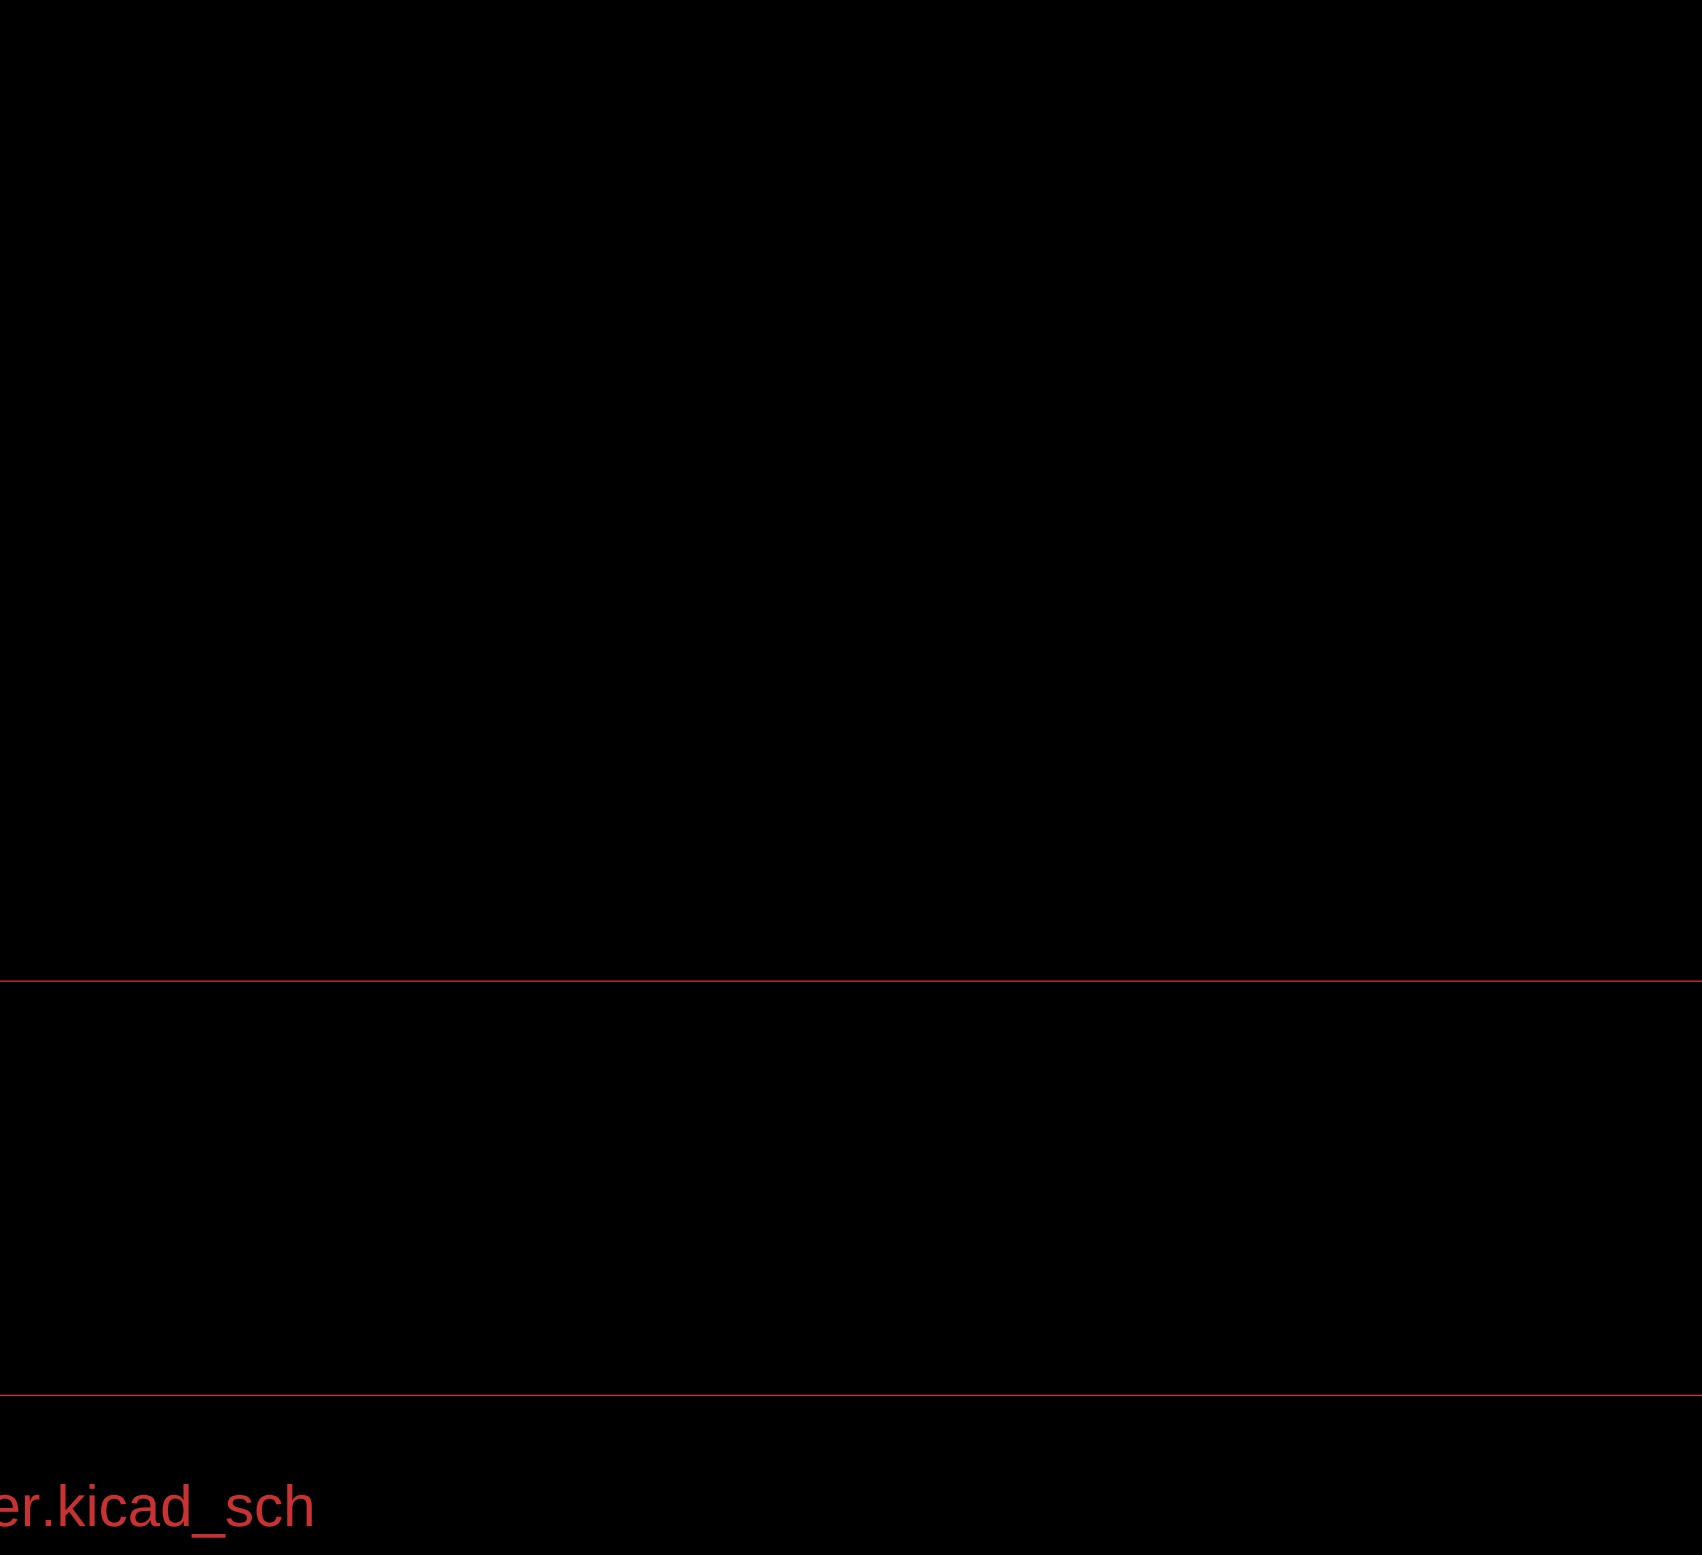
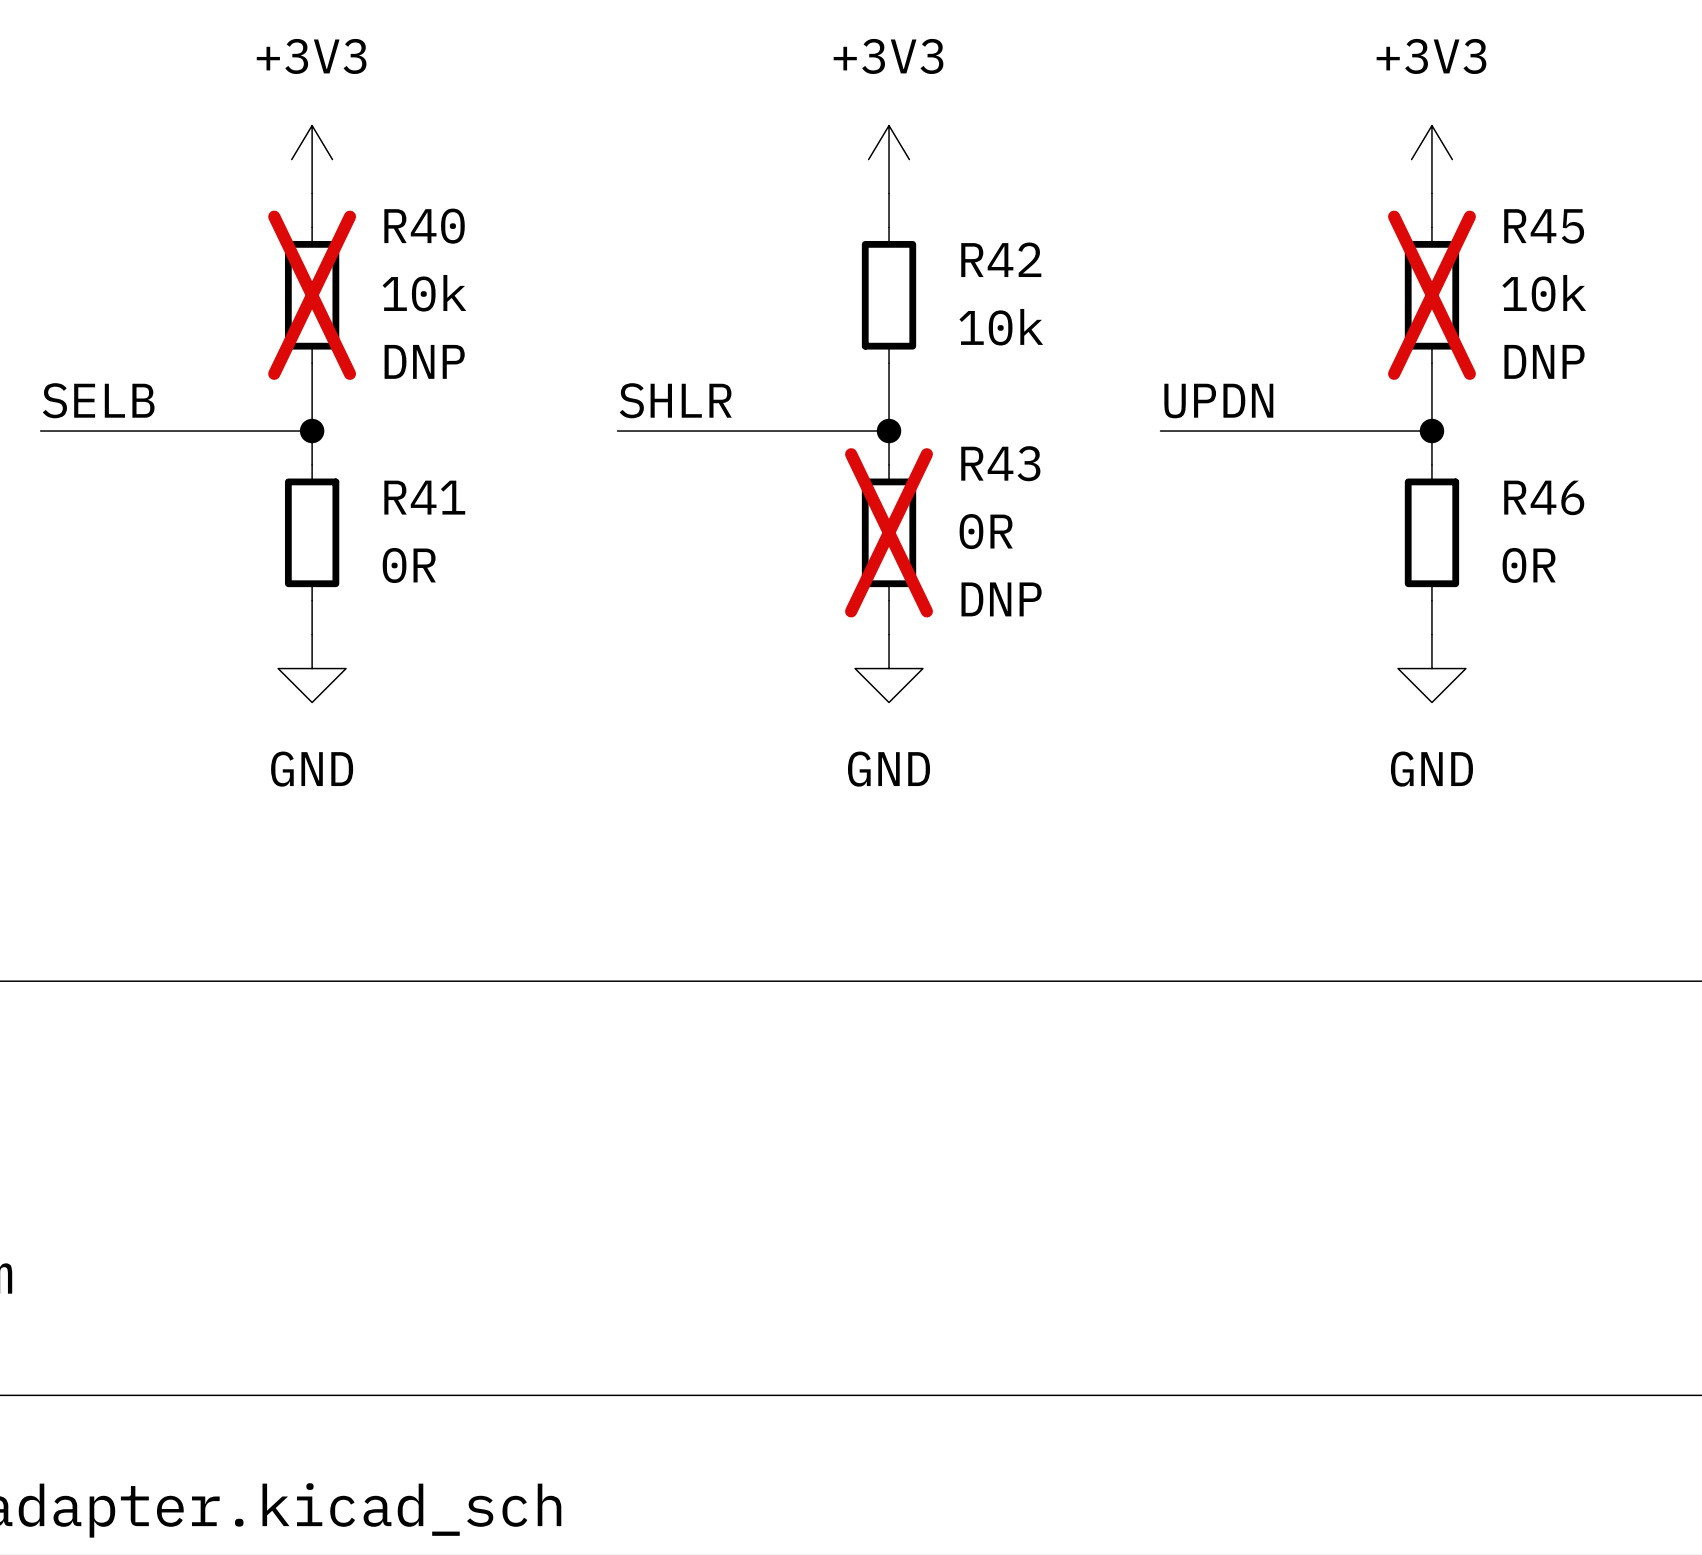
power symbol: none -> +3V3 (312, 159)
power symbol: none -> +3V3 (889, 159)
power symbol: none -> +3V3 (1431, 159)
wire: none -> (312, 193) (312, 227)
wire: none -> (889, 193) (889, 227)
wire: none -> (1431, 193) (1431, 227)
R40: none -> (312, 295)
R42: none -> (889, 295)
R45: none -> (1431, 295)
wire: none -> (312, 363) (312, 464)
wire: none -> (889, 363) (889, 464)
wire: none -> (1431, 363) (1431, 464)
label: none -> SELB (98, 400)
label: none -> SHLR (675, 400)
label: none -> UPDN (1218, 401)
wire: none -> (40, 431) (312, 431)
junction: none -> (312, 431)
wire: none -> (617, 431) (889, 431)
junction: none -> (889, 431)
wire: none -> (1160, 431) (1431, 431)
junction: none -> (1431, 431)
R41: none -> (312, 532)
R43: none -> (889, 532)
R46: none -> (1431, 532)
wire: none -> (312, 600) (312, 634)
wire: none -> (889, 600) (889, 634)
wire: none -> (1431, 600) (1431, 634)
power symbol: none -> GND (312, 668)
power symbol: none -> GND (889, 668)
power symbol: none -> GND (1431, 668)

